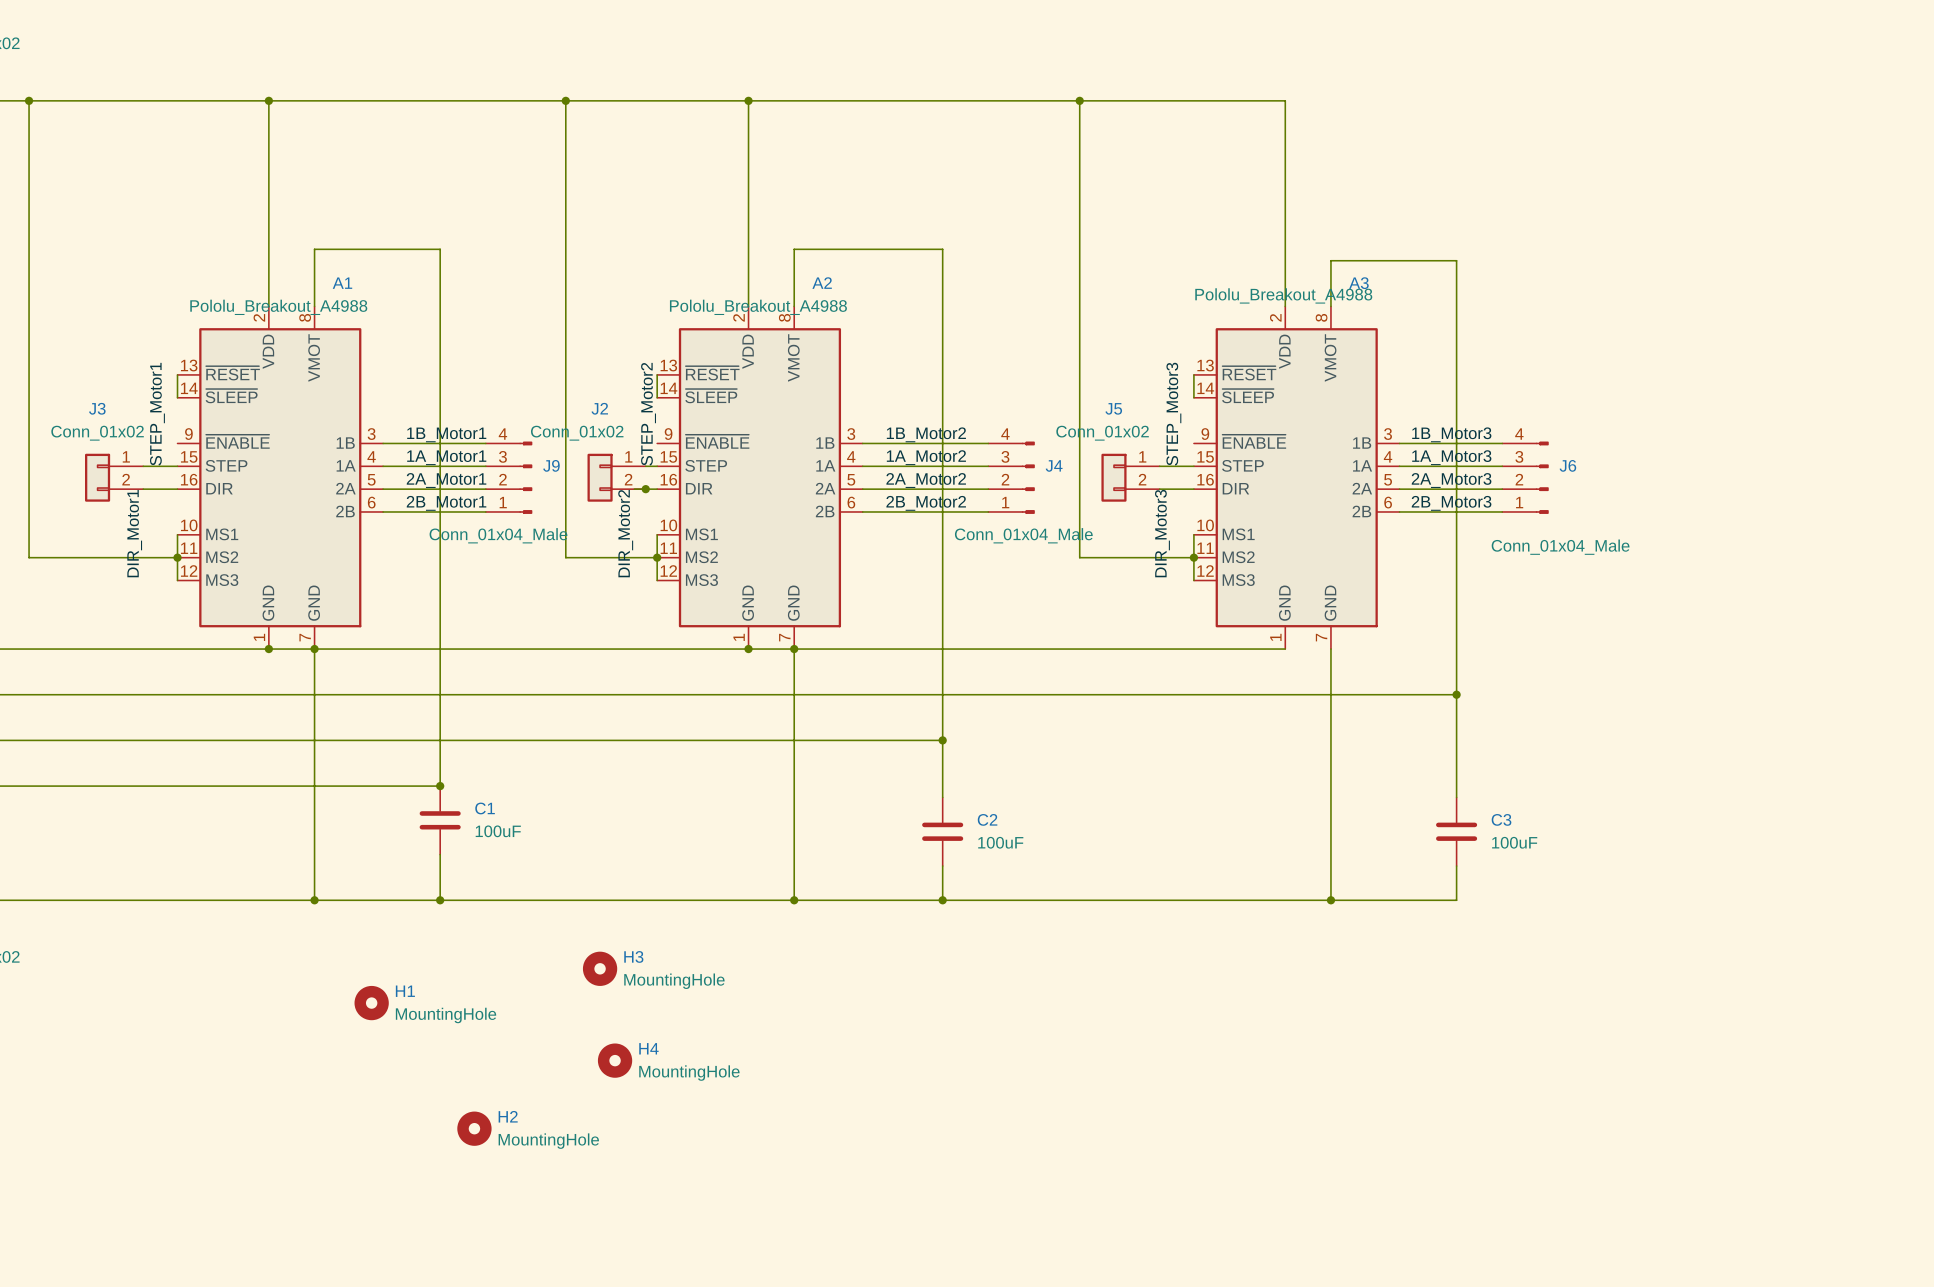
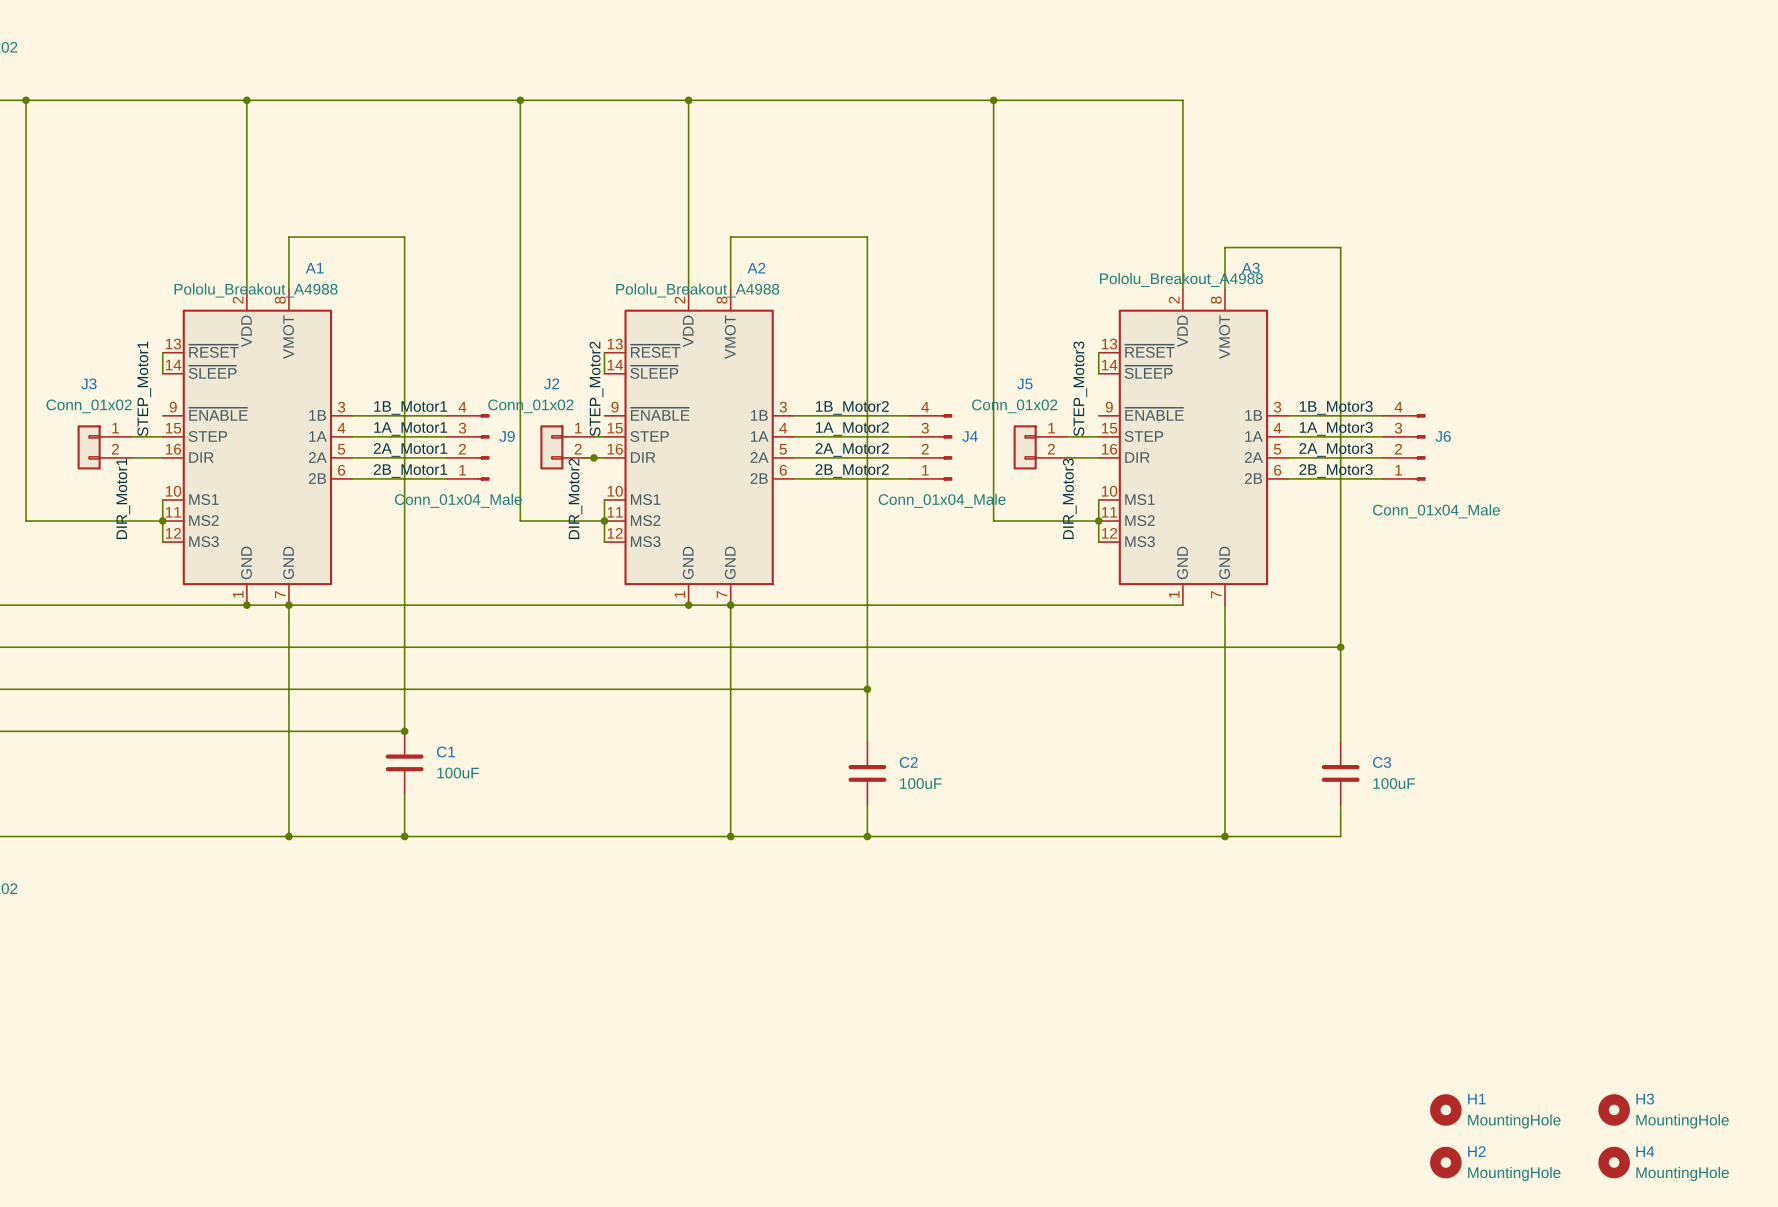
H3 position: (600, 968) -> (1614, 1109)
H1 position: (371, 1003) -> (1445, 1109)
H4 position: (615, 1060) -> (1614, 1162)
H2 position: (474, 1128) -> (1445, 1162)

